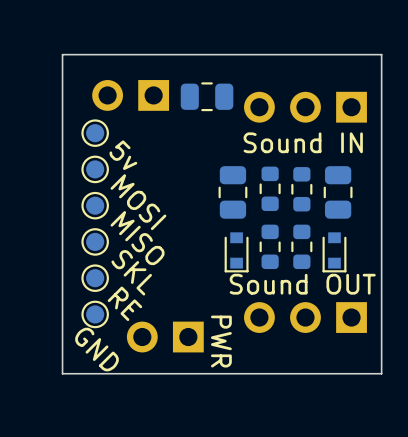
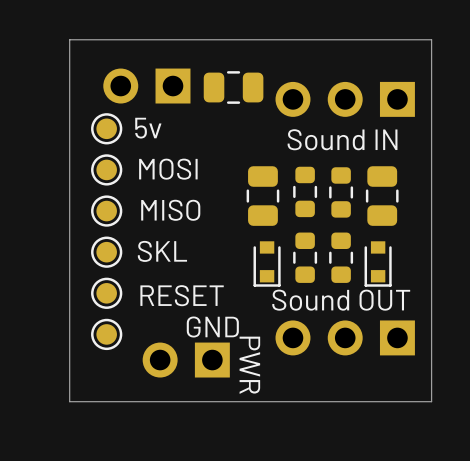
part value rotation: 0° (123, 155) -> 45° counterclockwise (148, 128)
part value rotation: 0° (138, 202) -> 45° counterclockwise (168, 169)
part value rotation: 0° (137, 238) -> 45° counterclockwise (170, 210)
part value rotation: 0° (131, 272) -> 45° counterclockwise (162, 251)
part value: RE (124, 303) -> RESET (182, 295)
part value rotation: 0° (96, 349) -> 45° counterclockwise (212, 327)
part value position: GND (96, 349) -> GND (212, 327)

